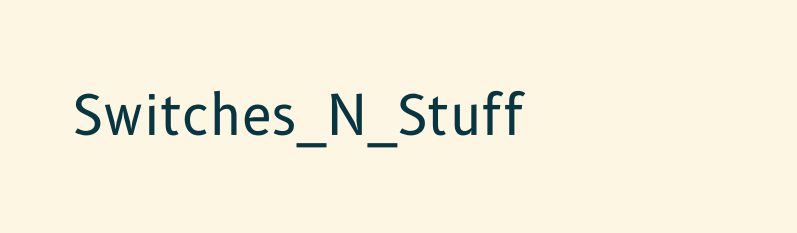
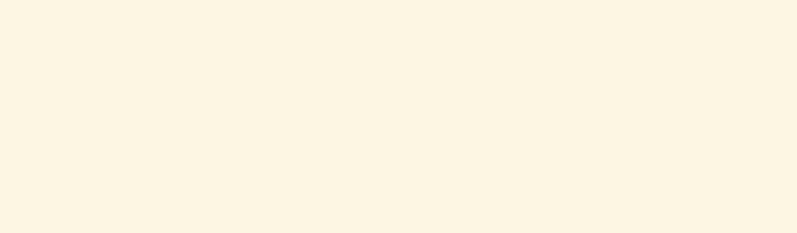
label: Switches_N_Stuff (300, 119) -> none

